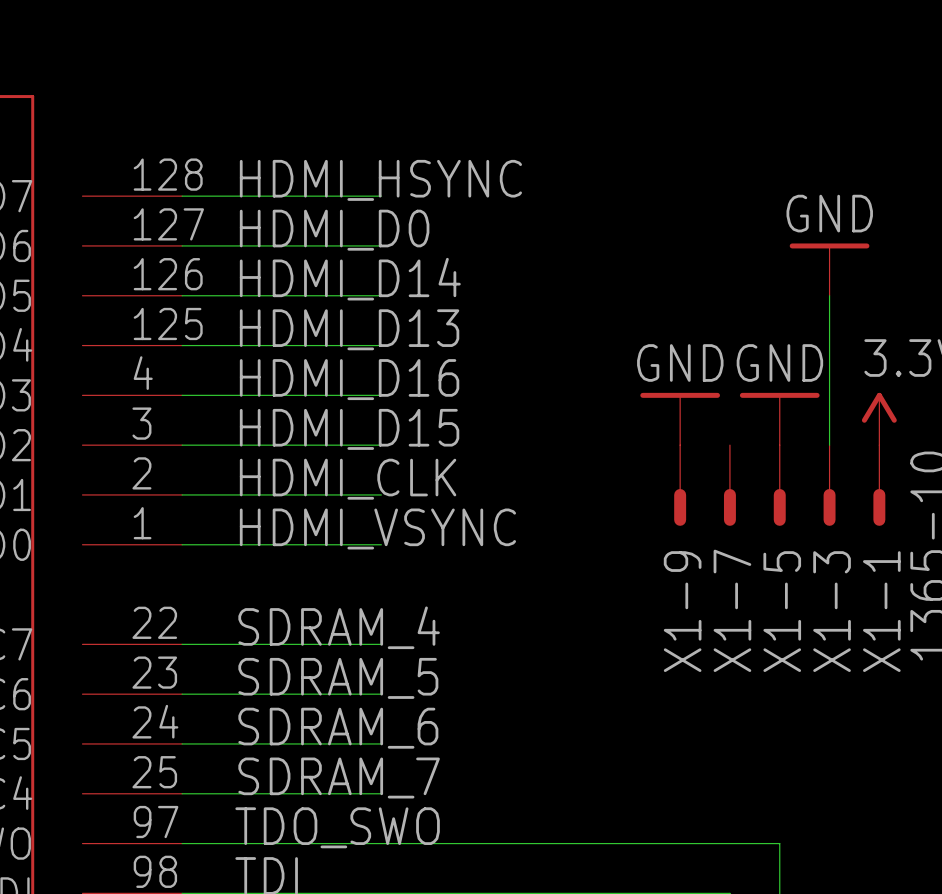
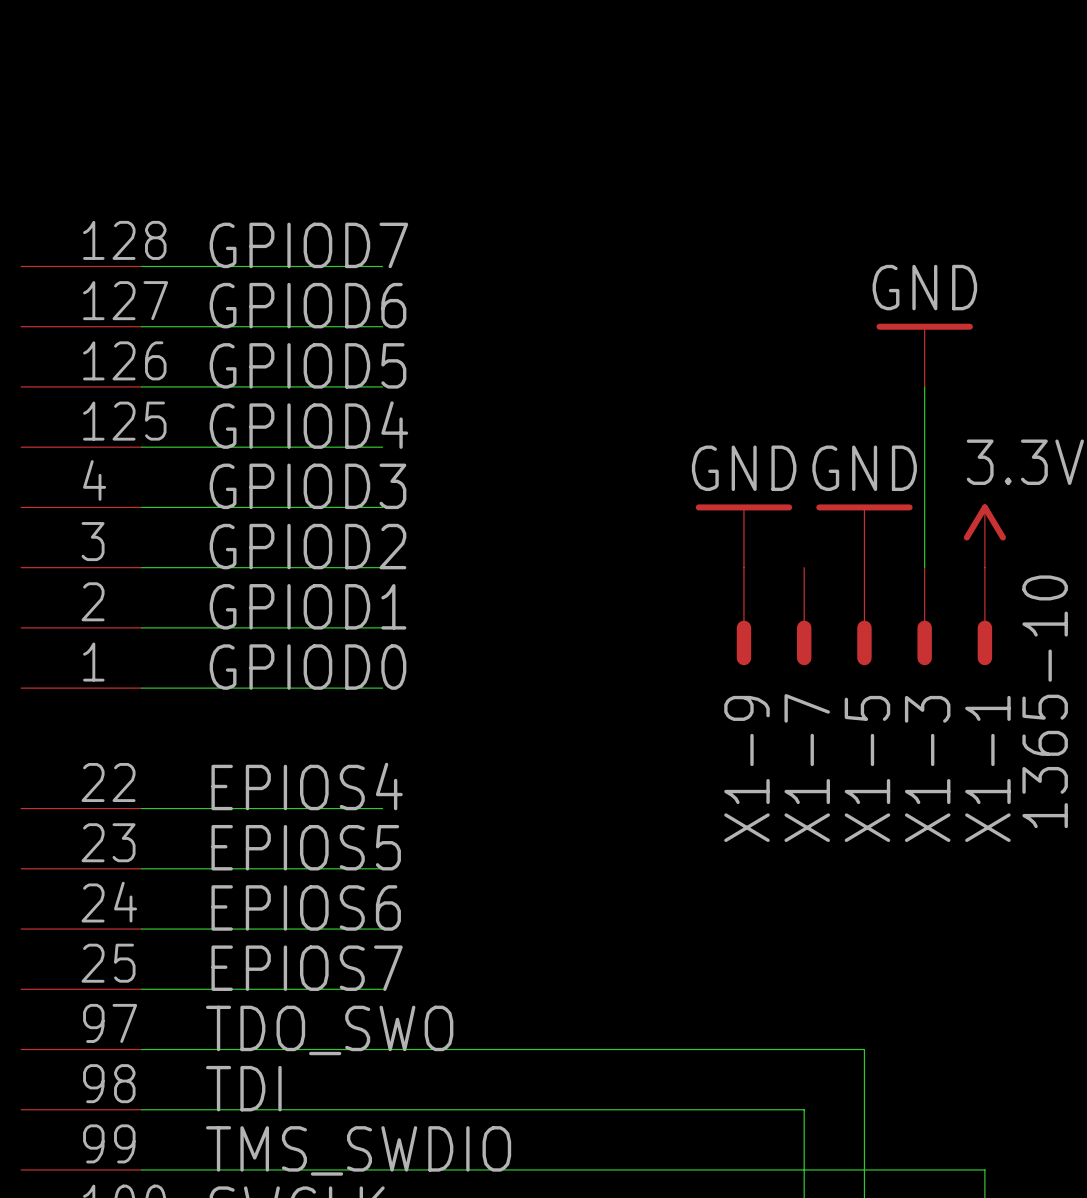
label: HDMI_HSYNC (380, 180) -> GPIOD7 (308, 245)
label: HDMI_D0 (334, 230) -> GPIOD6 (308, 305)
label: HDMI_D14 (350, 279) -> GPIOD5 (308, 365)
label: HDMI_D13 (349, 329) -> GPIOD4 (308, 425)
label: HDMI_D16 (349, 379) -> GPIOD3 (308, 486)
label: HDMI_D15 (349, 429) -> GPIOD2 (308, 546)
label: HDMI_CLK (348, 479) -> GPIOD1 (308, 606)
label: HDMI_VSYNC (377, 529) -> GPIOD0 (308, 667)
label: SDRAM_4 (339, 627) -> EPIOS4 (307, 786)
label: SDRAM_5 (338, 678) -> EPIOS5 (306, 847)
label: SDRAM_6 (338, 728) -> EPIOS6 (306, 907)
label: SDRAM_7 (339, 778) -> EPIOS7 (307, 968)

